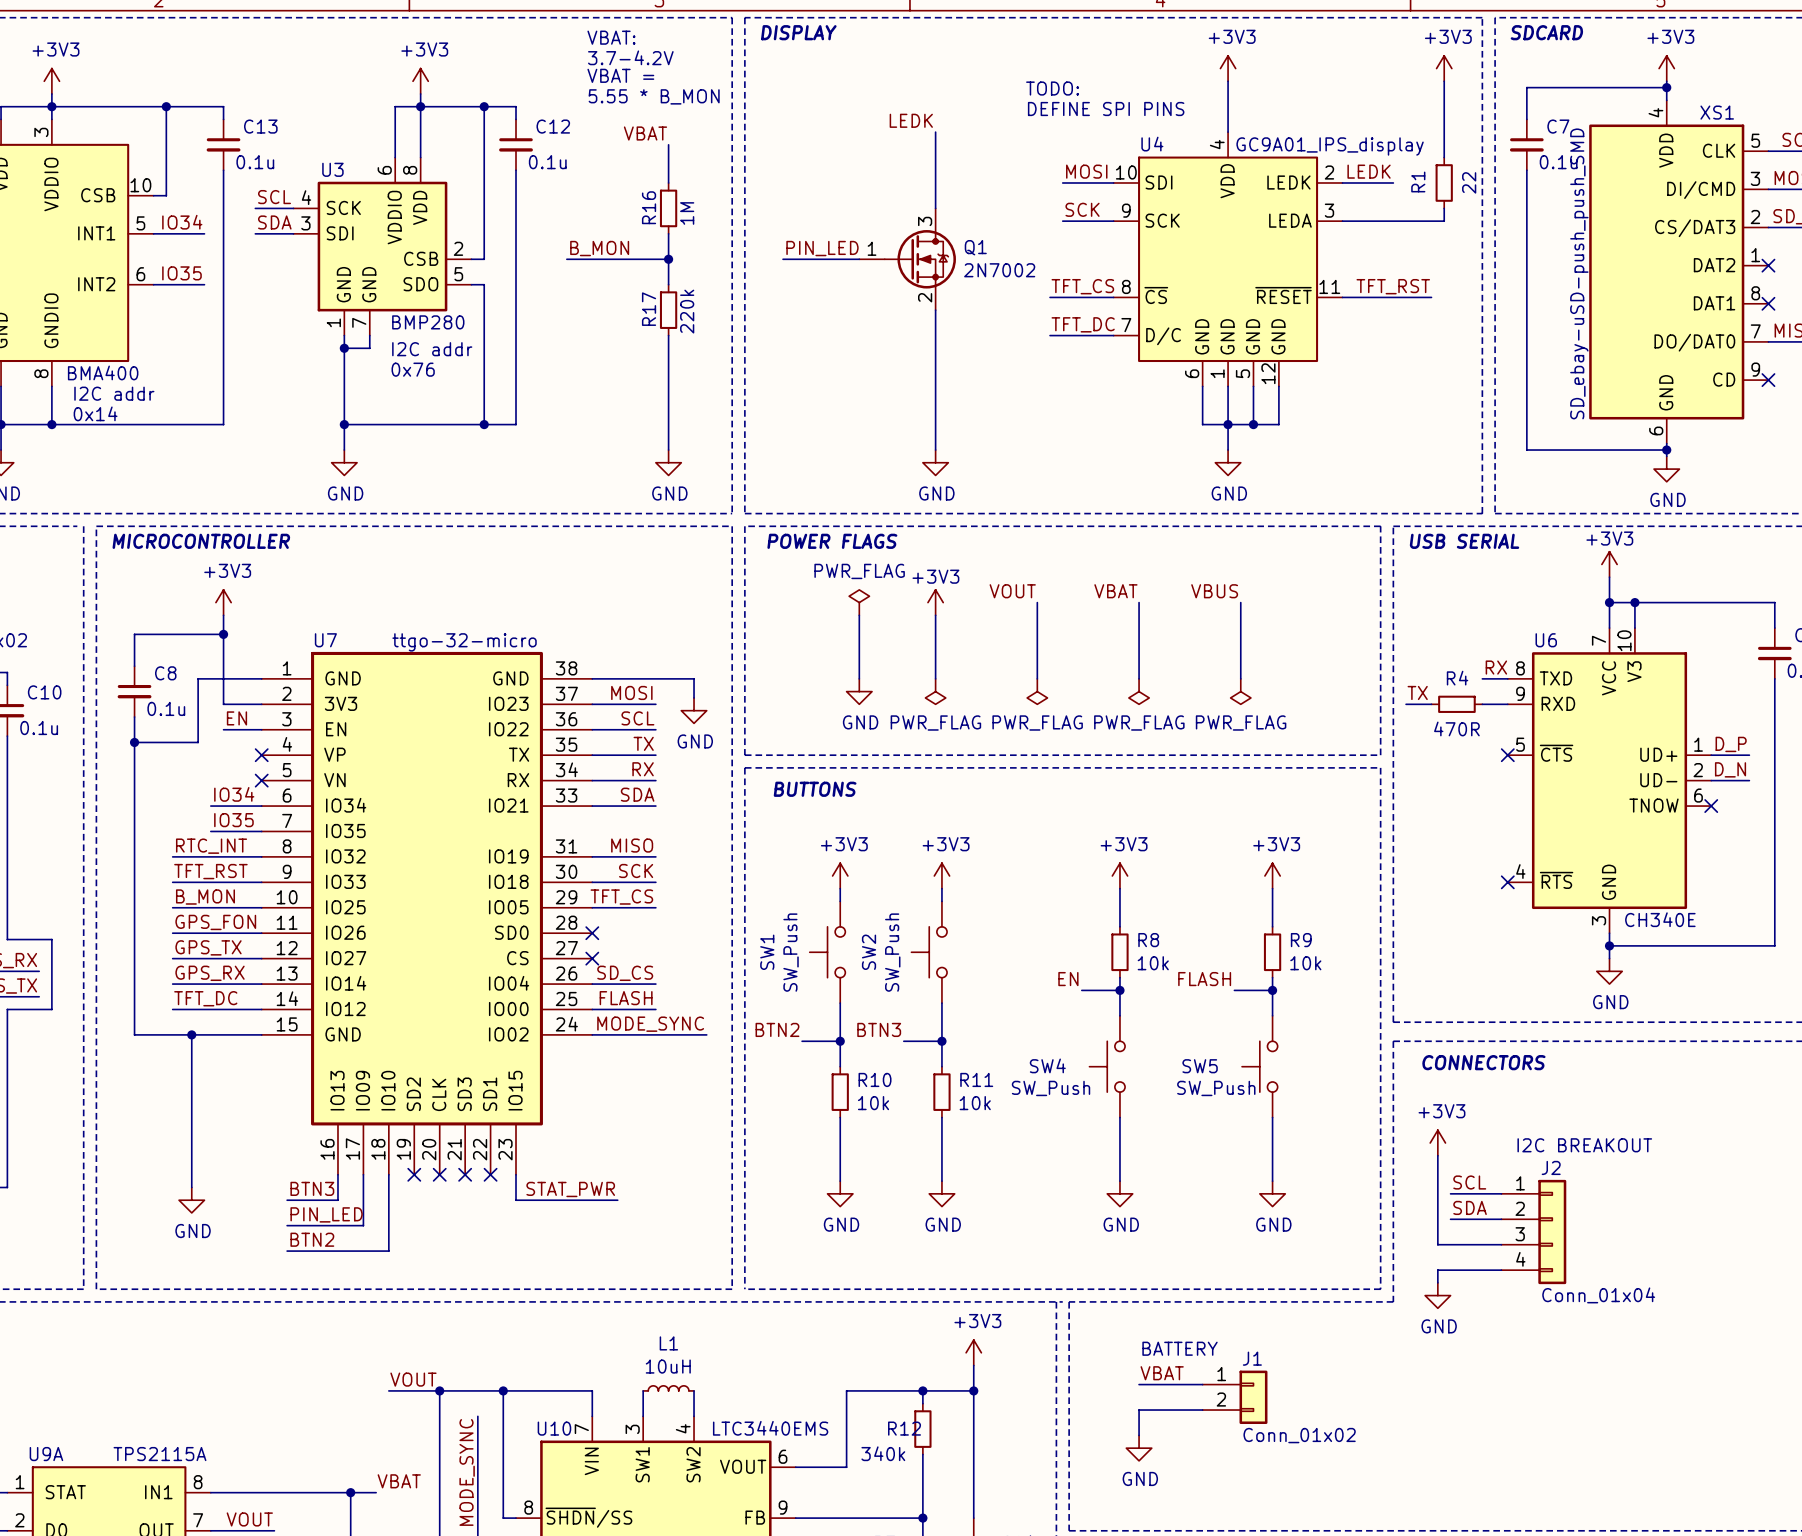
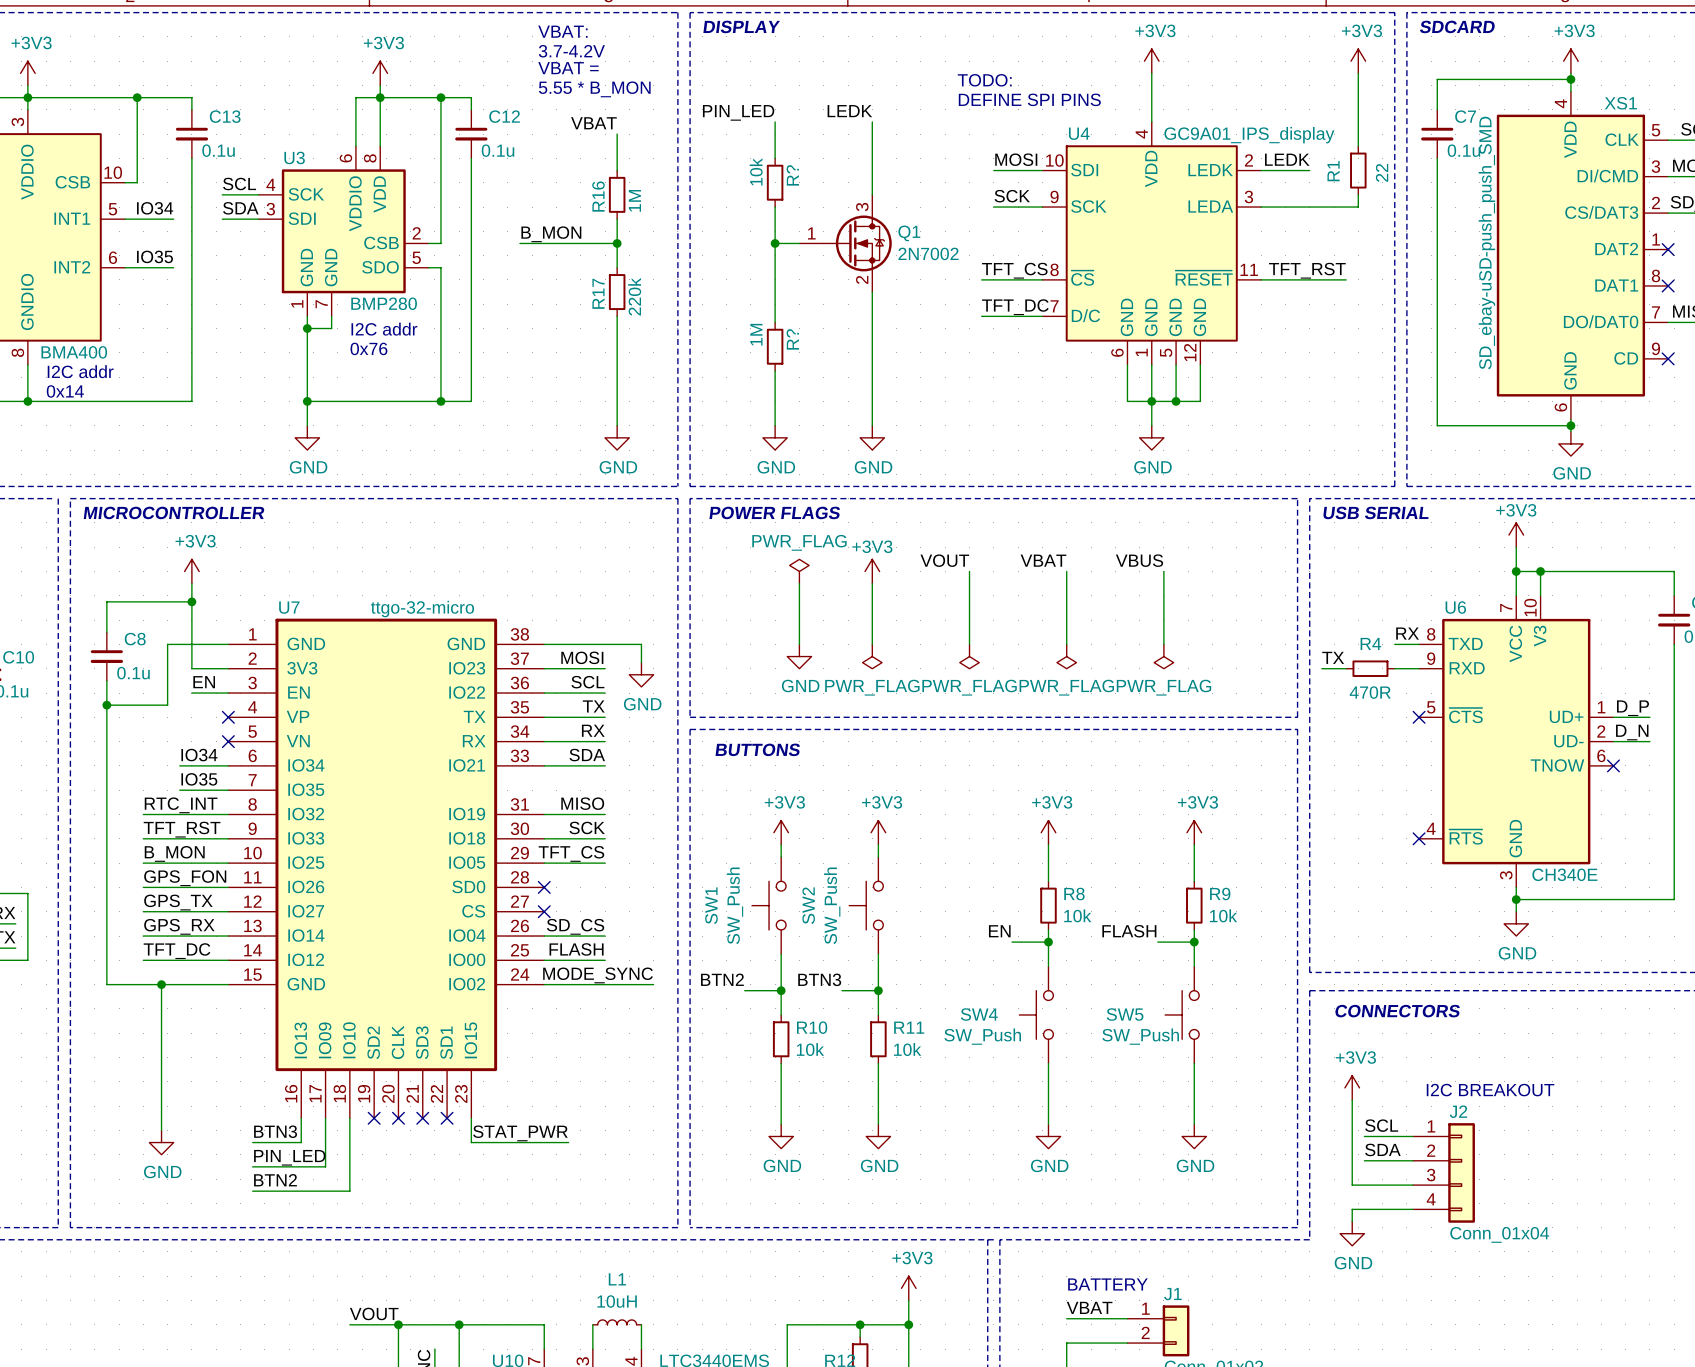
wire: none -> (775, 121) (775, 158)
R?: none -> 10k (775, 182)
wire: none -> (775, 207) (775, 322)
label position: PIN_LED (822, 248) -> PIN_LED (738, 112)
wire: (783, 259) (833, 259) -> none
junction: none -> (775, 243)
R?: none -> 1M (775, 346)
wire: none -> (775, 371) (775, 425)
power symbol: none -> GND (775, 437)

